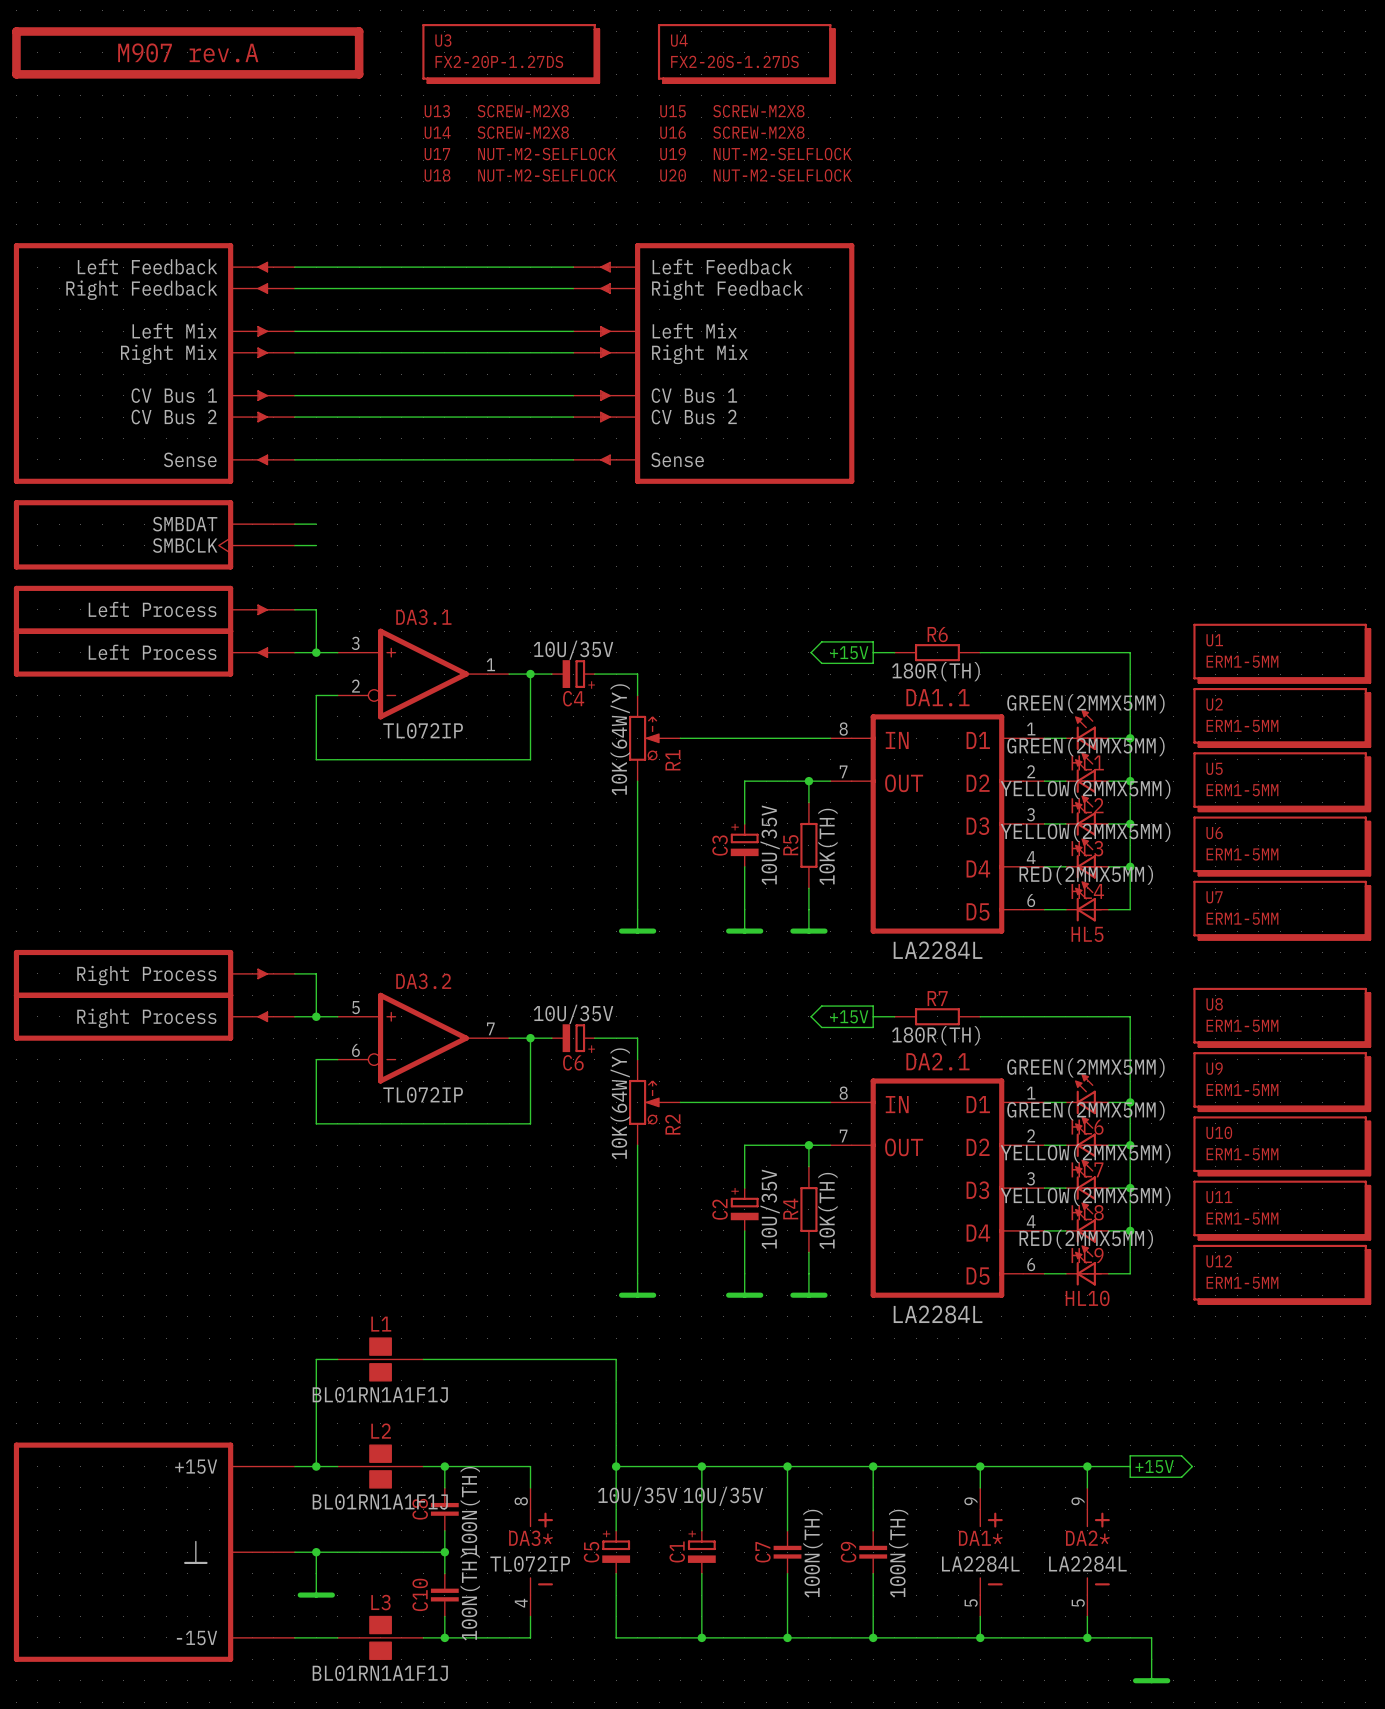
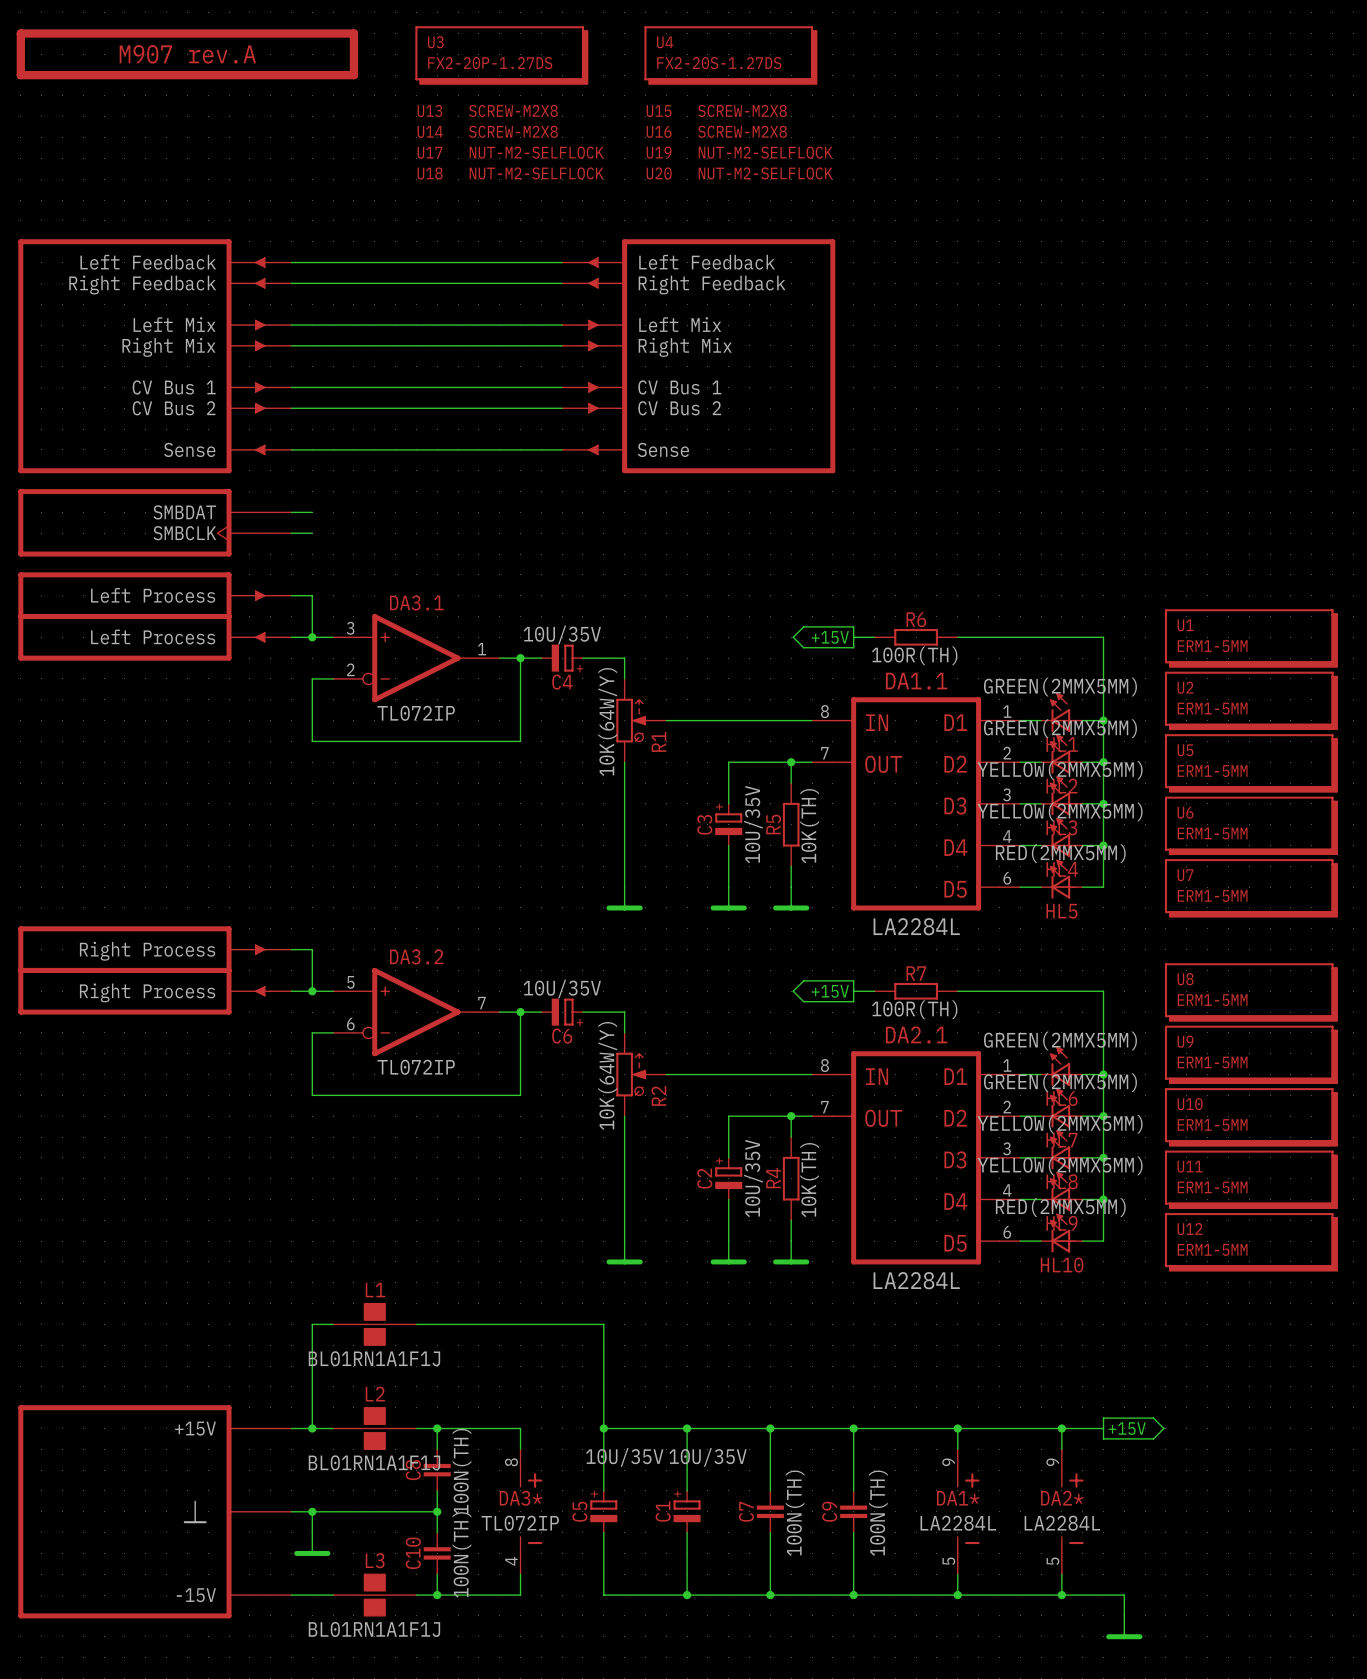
R6 value: 180R(TH) (935, 671) -> 100R(TH) (914, 655)
R7 value: 180R(TH) (935, 1035) -> 100R(TH) (914, 1009)

